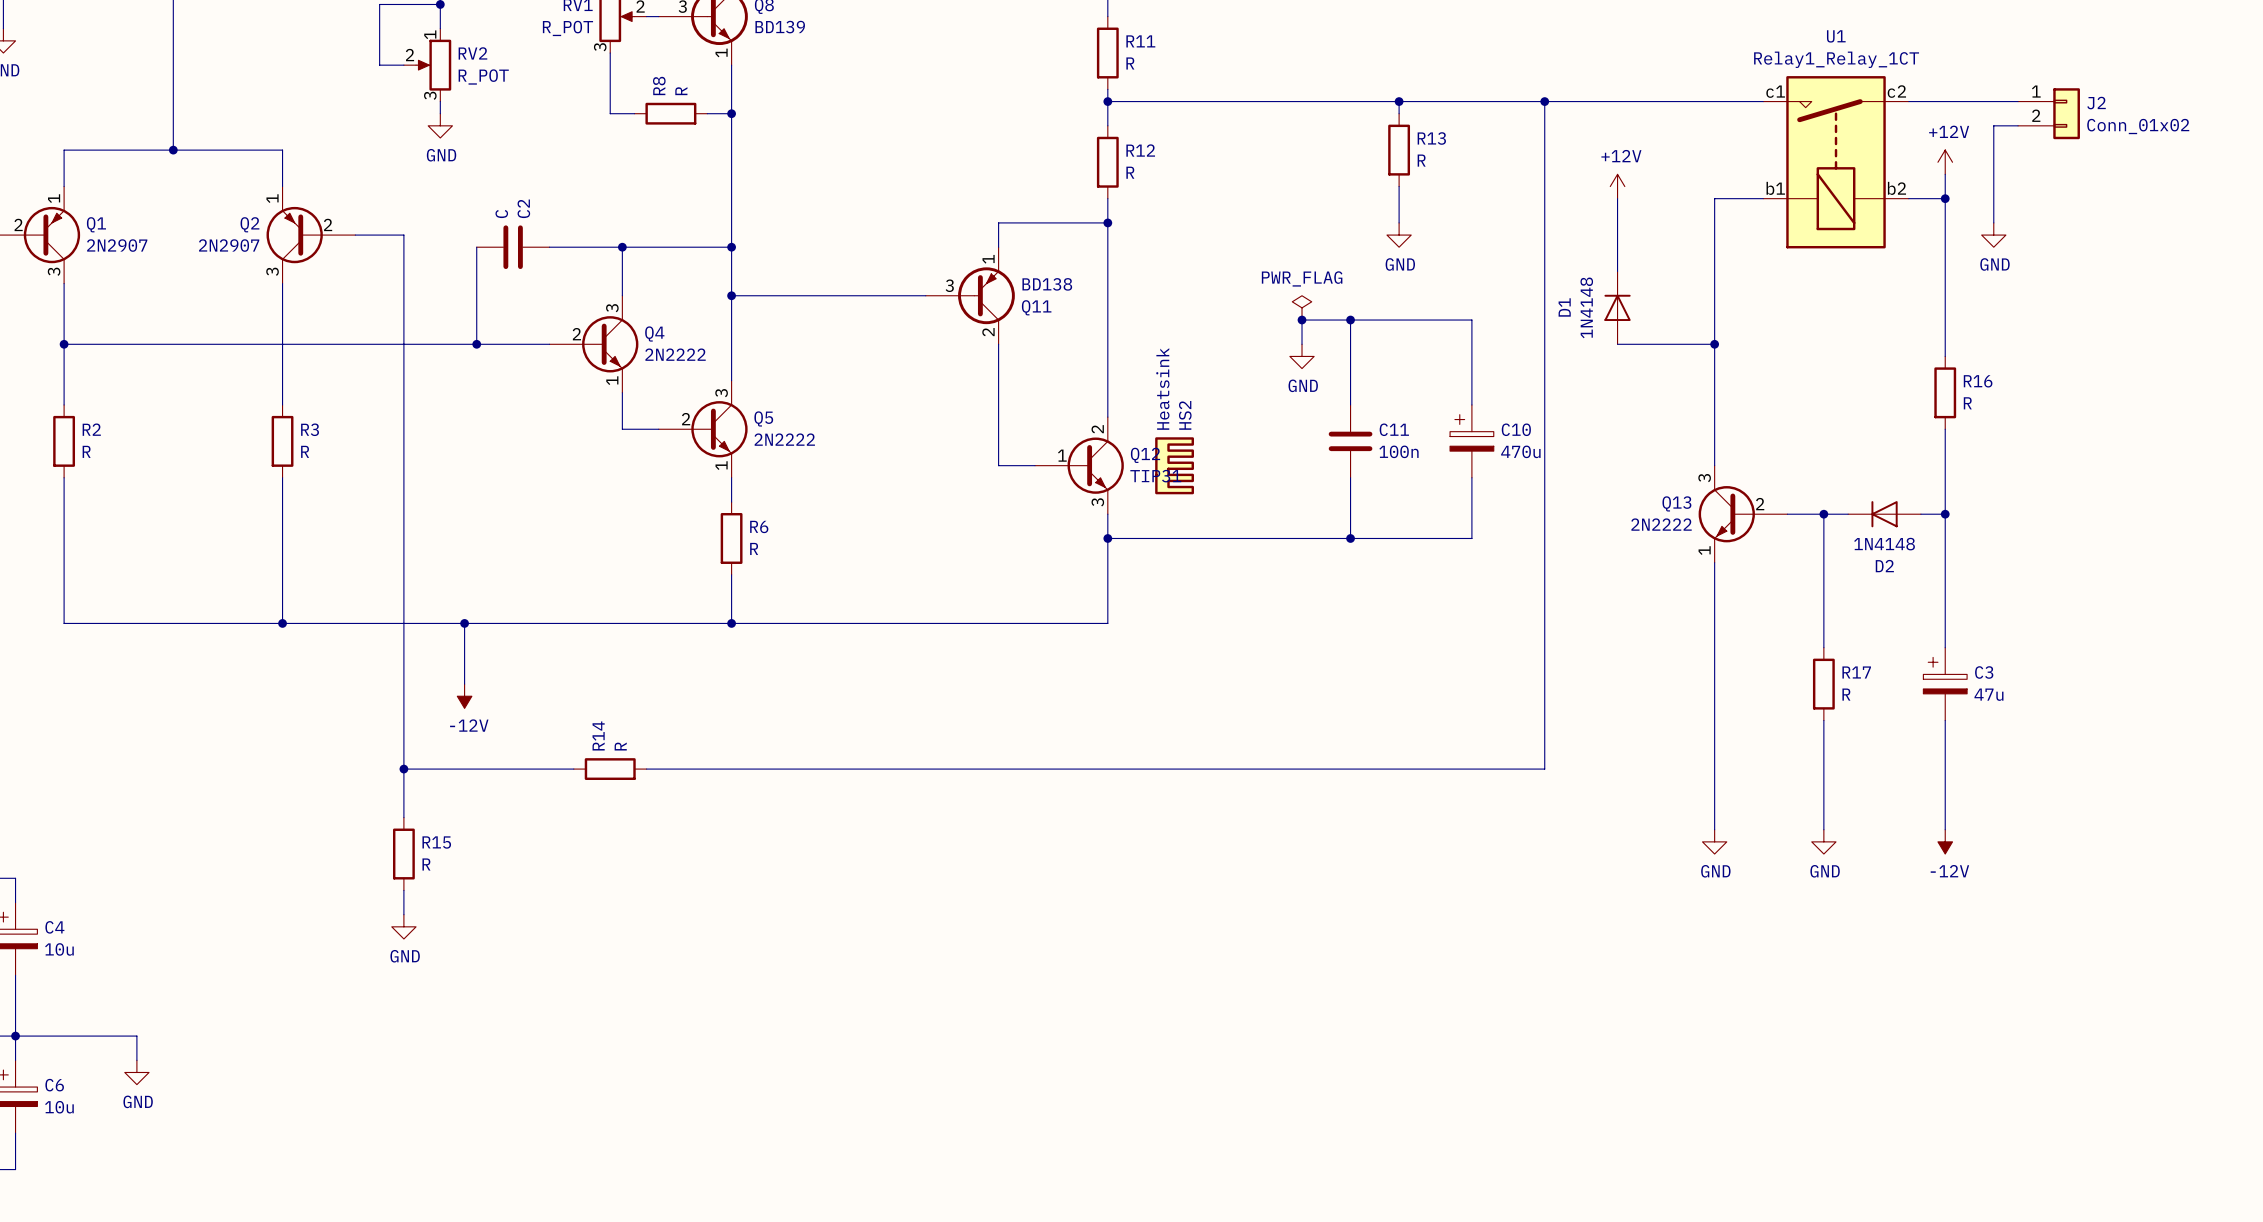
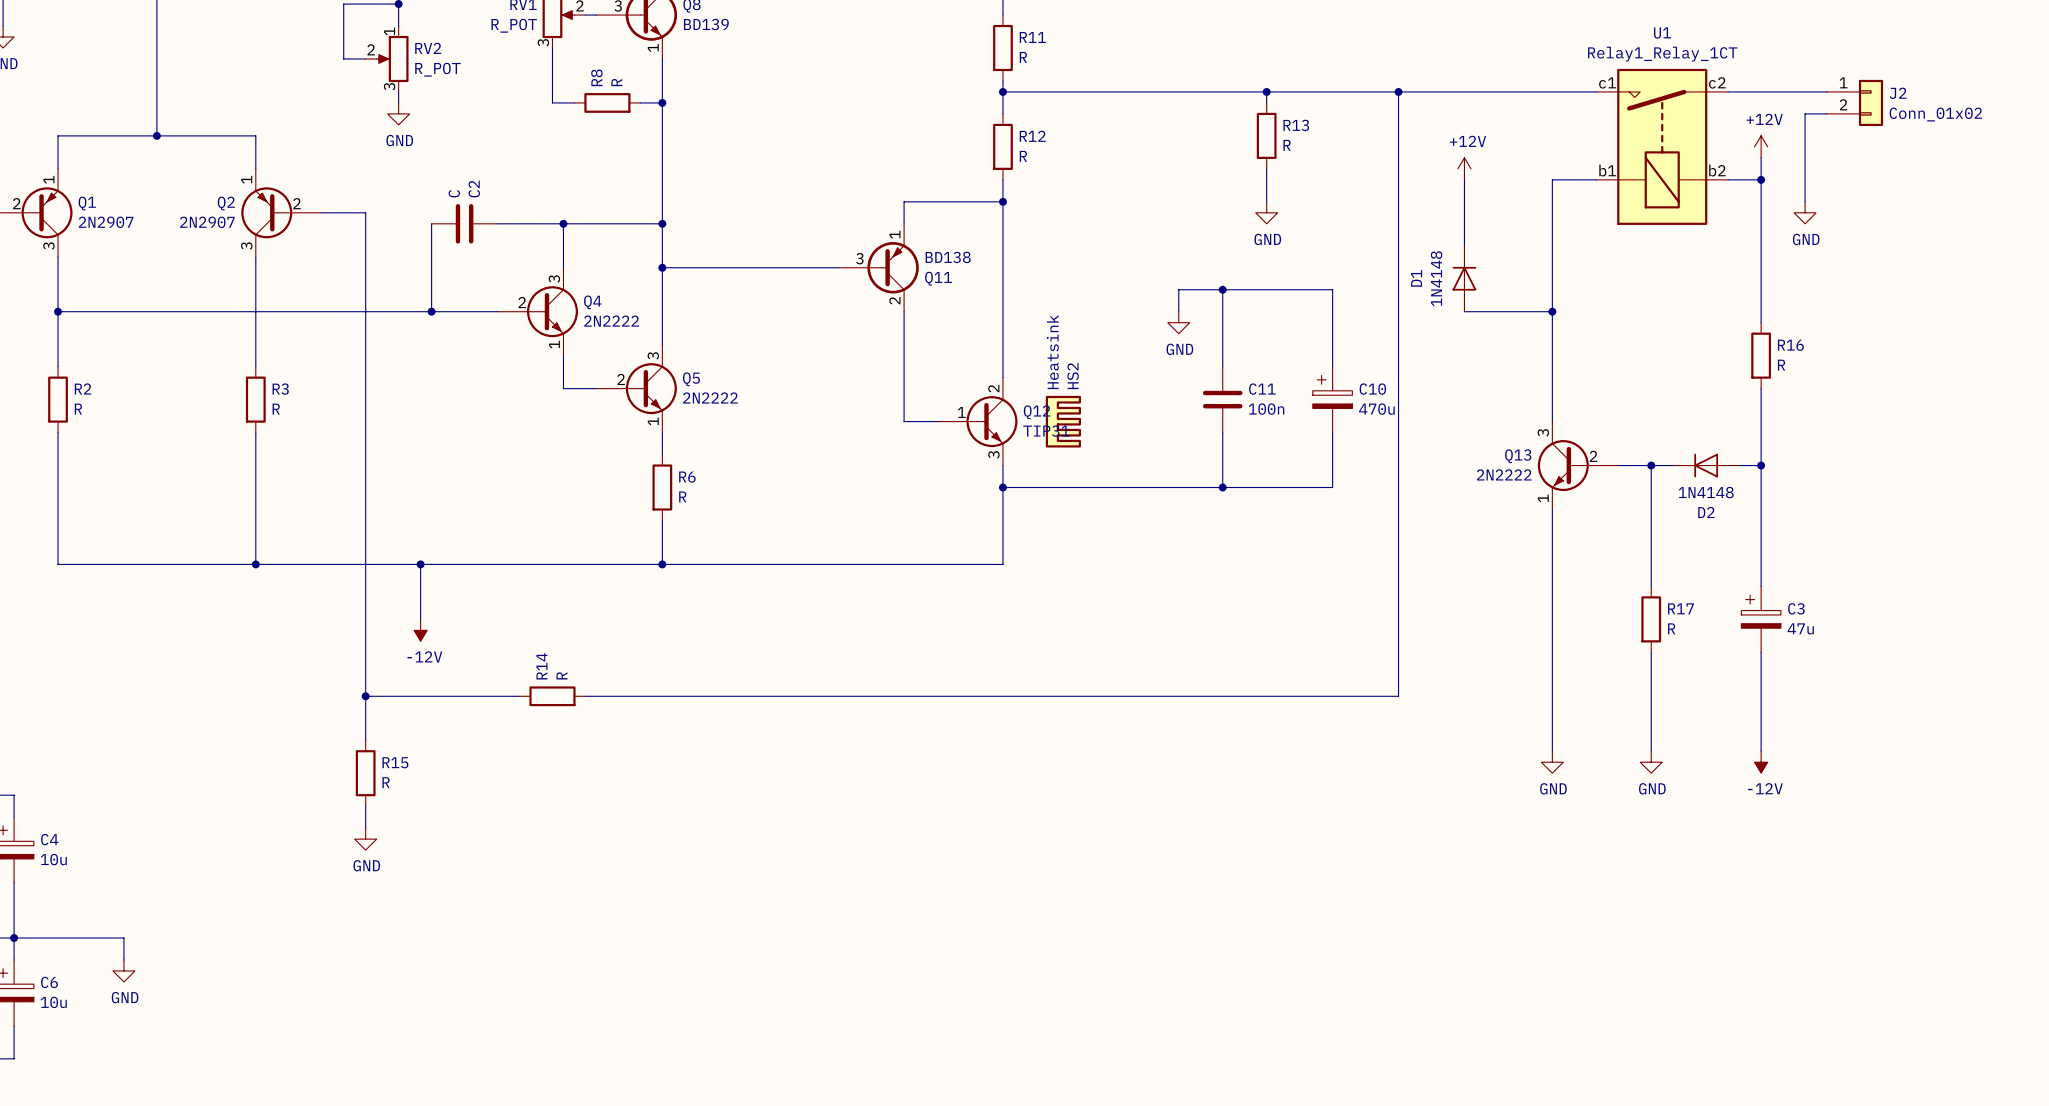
power symbol: PWR_FLAG (1302, 307) -> none
junction: (1302, 320) -> none

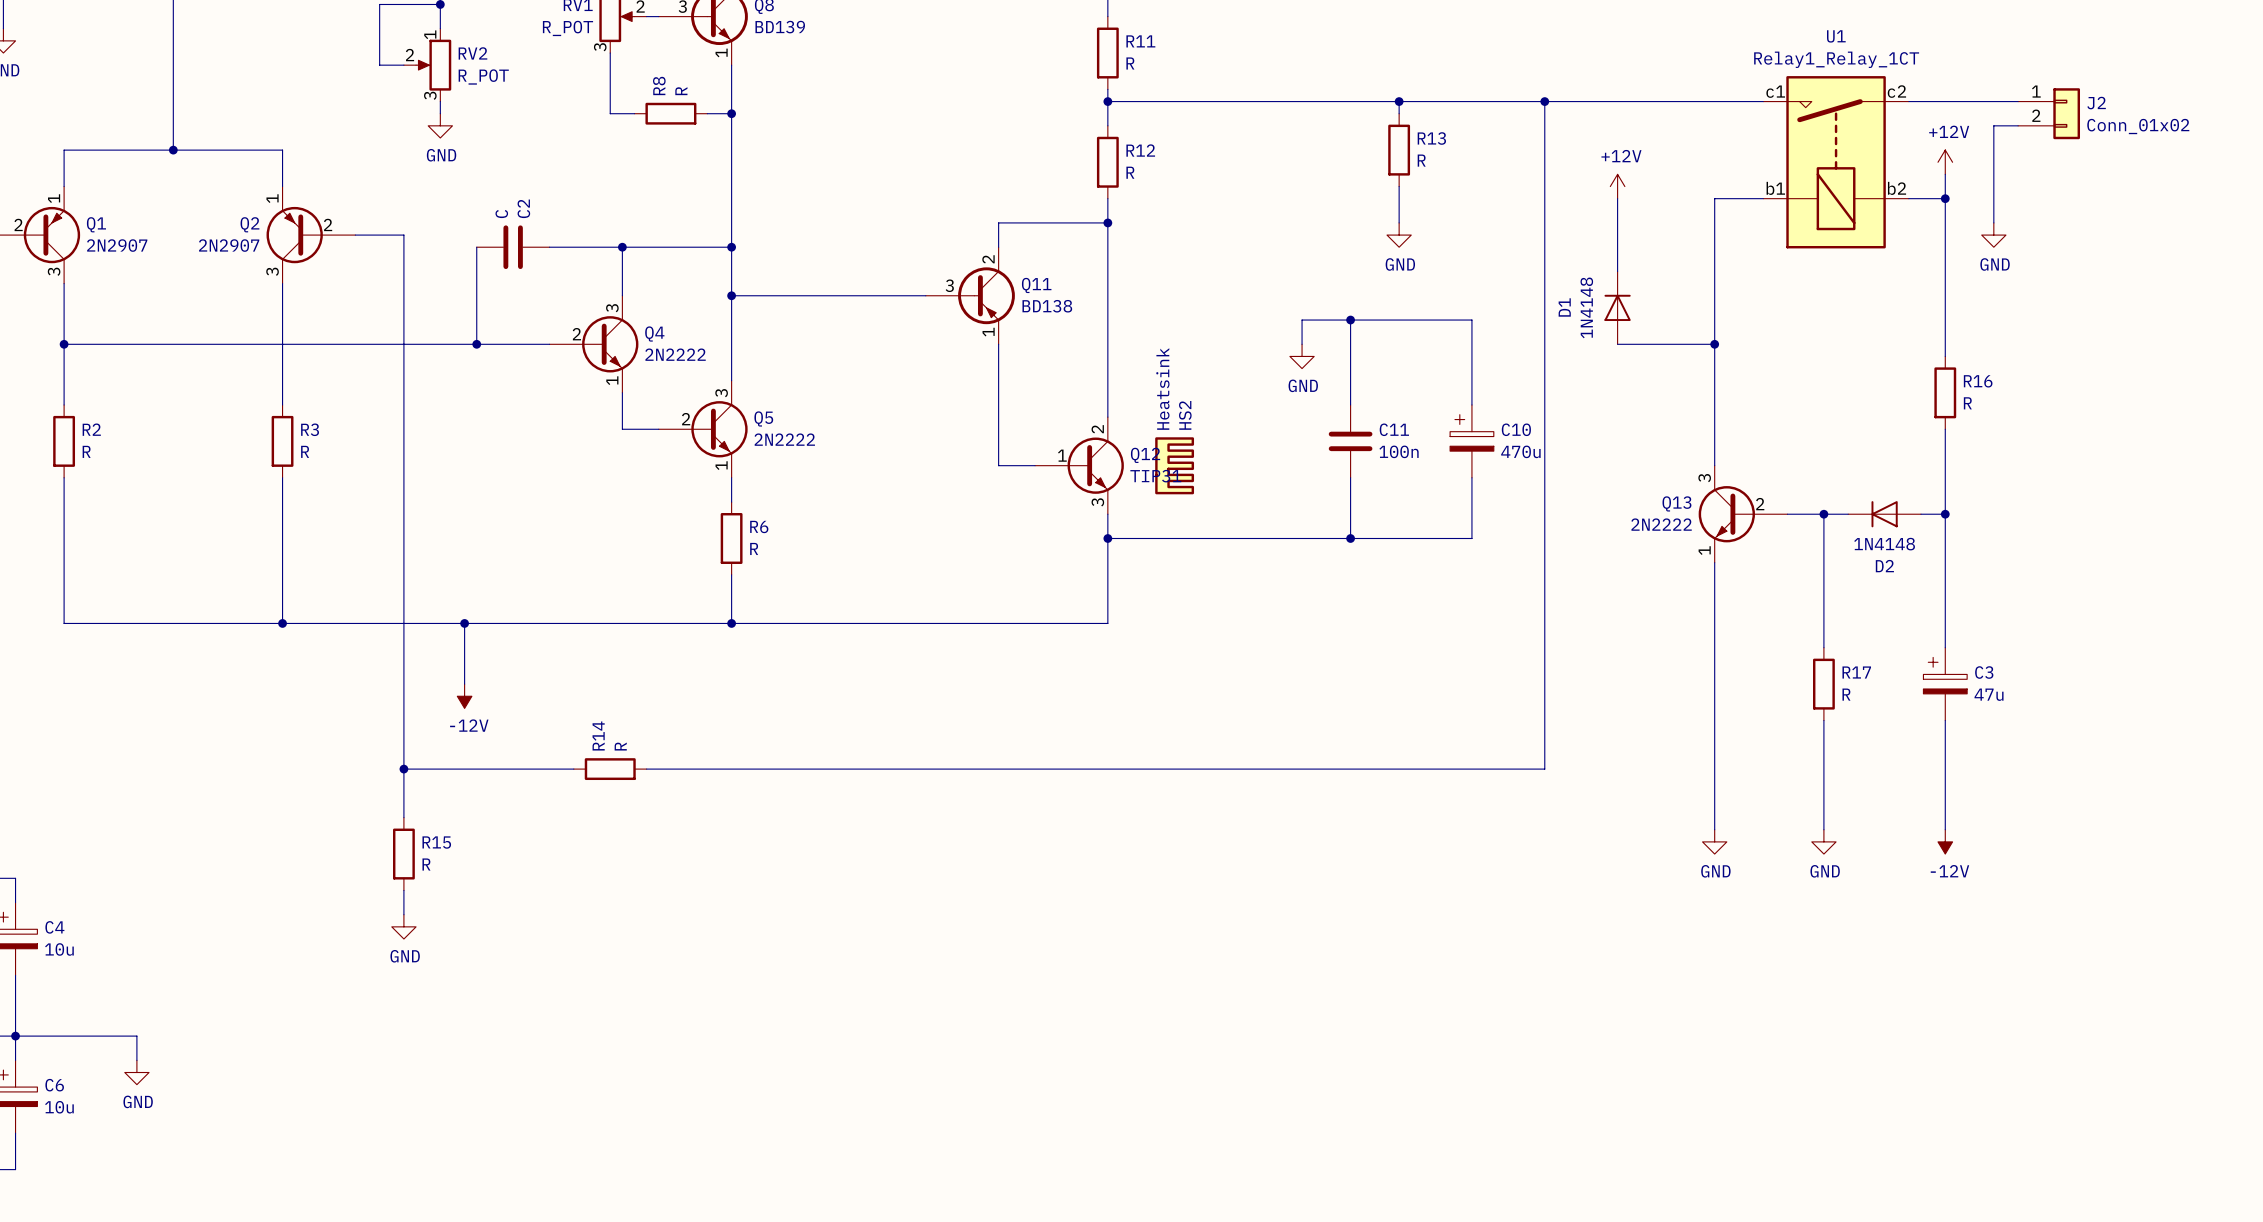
Q11 flip: as is (893, 267) -> up-down (986, 295)

